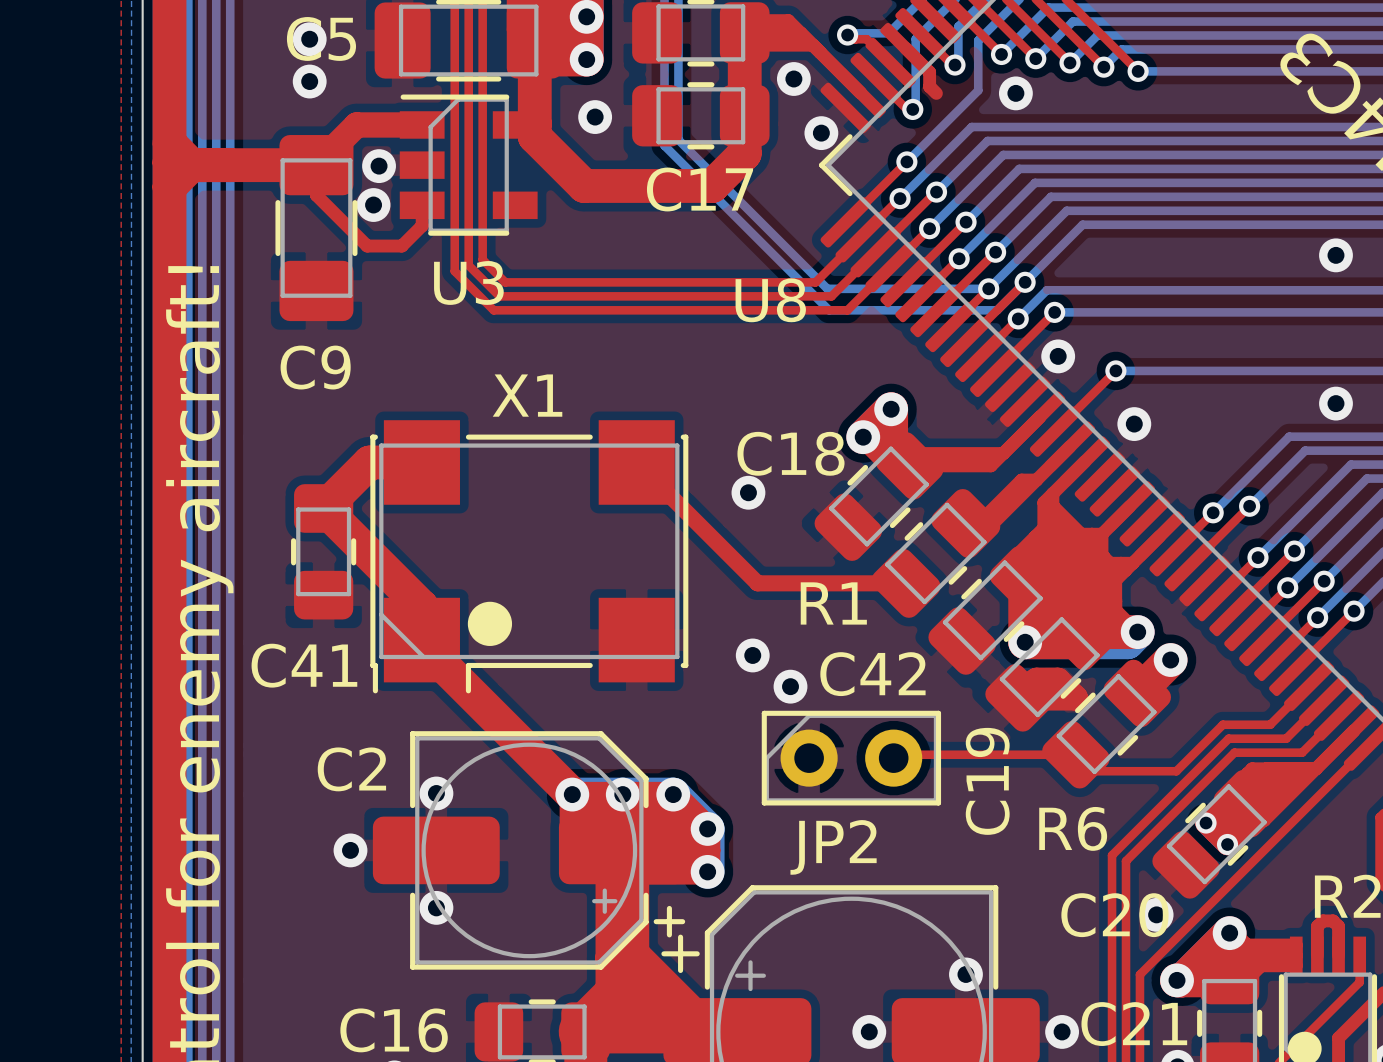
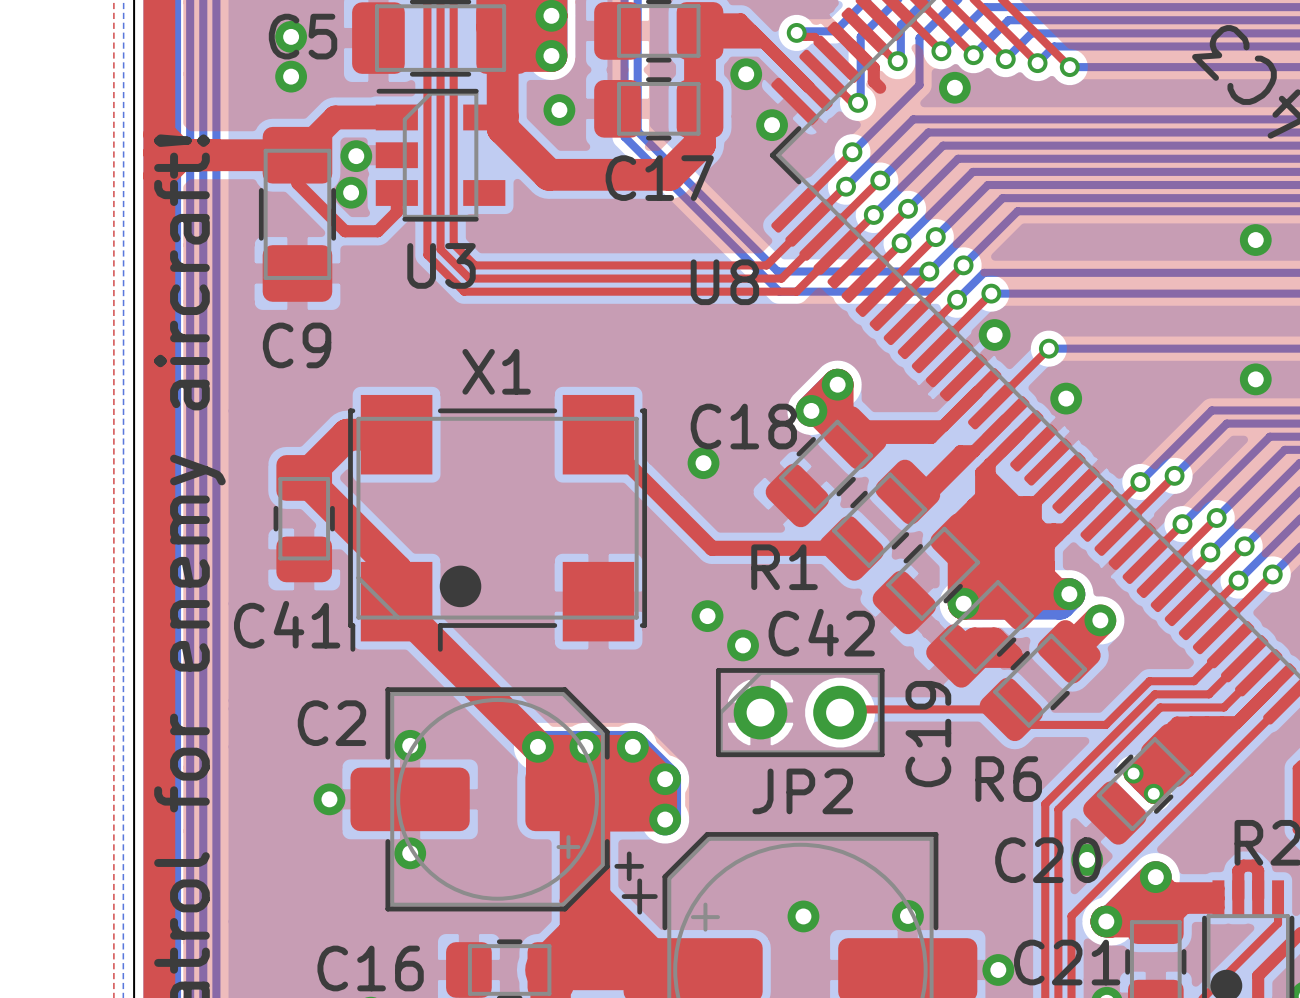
via position: (869, 1031) -> (803, 916)

